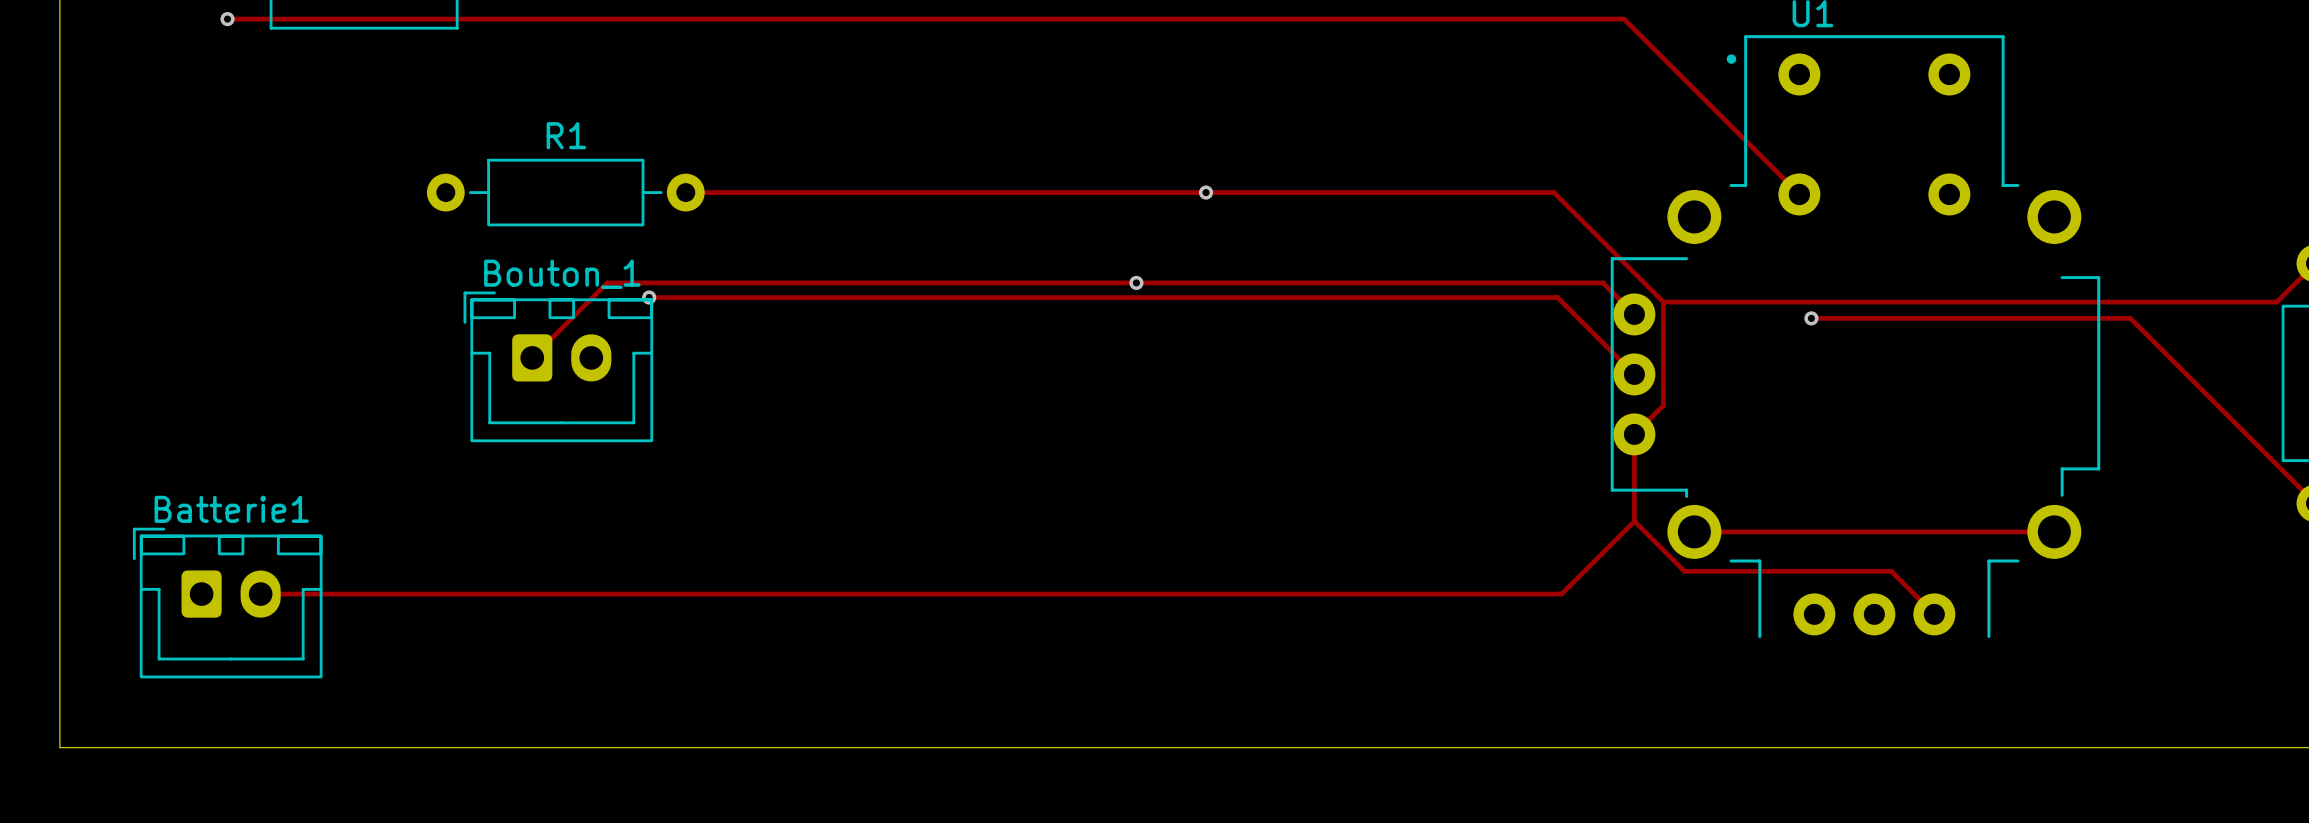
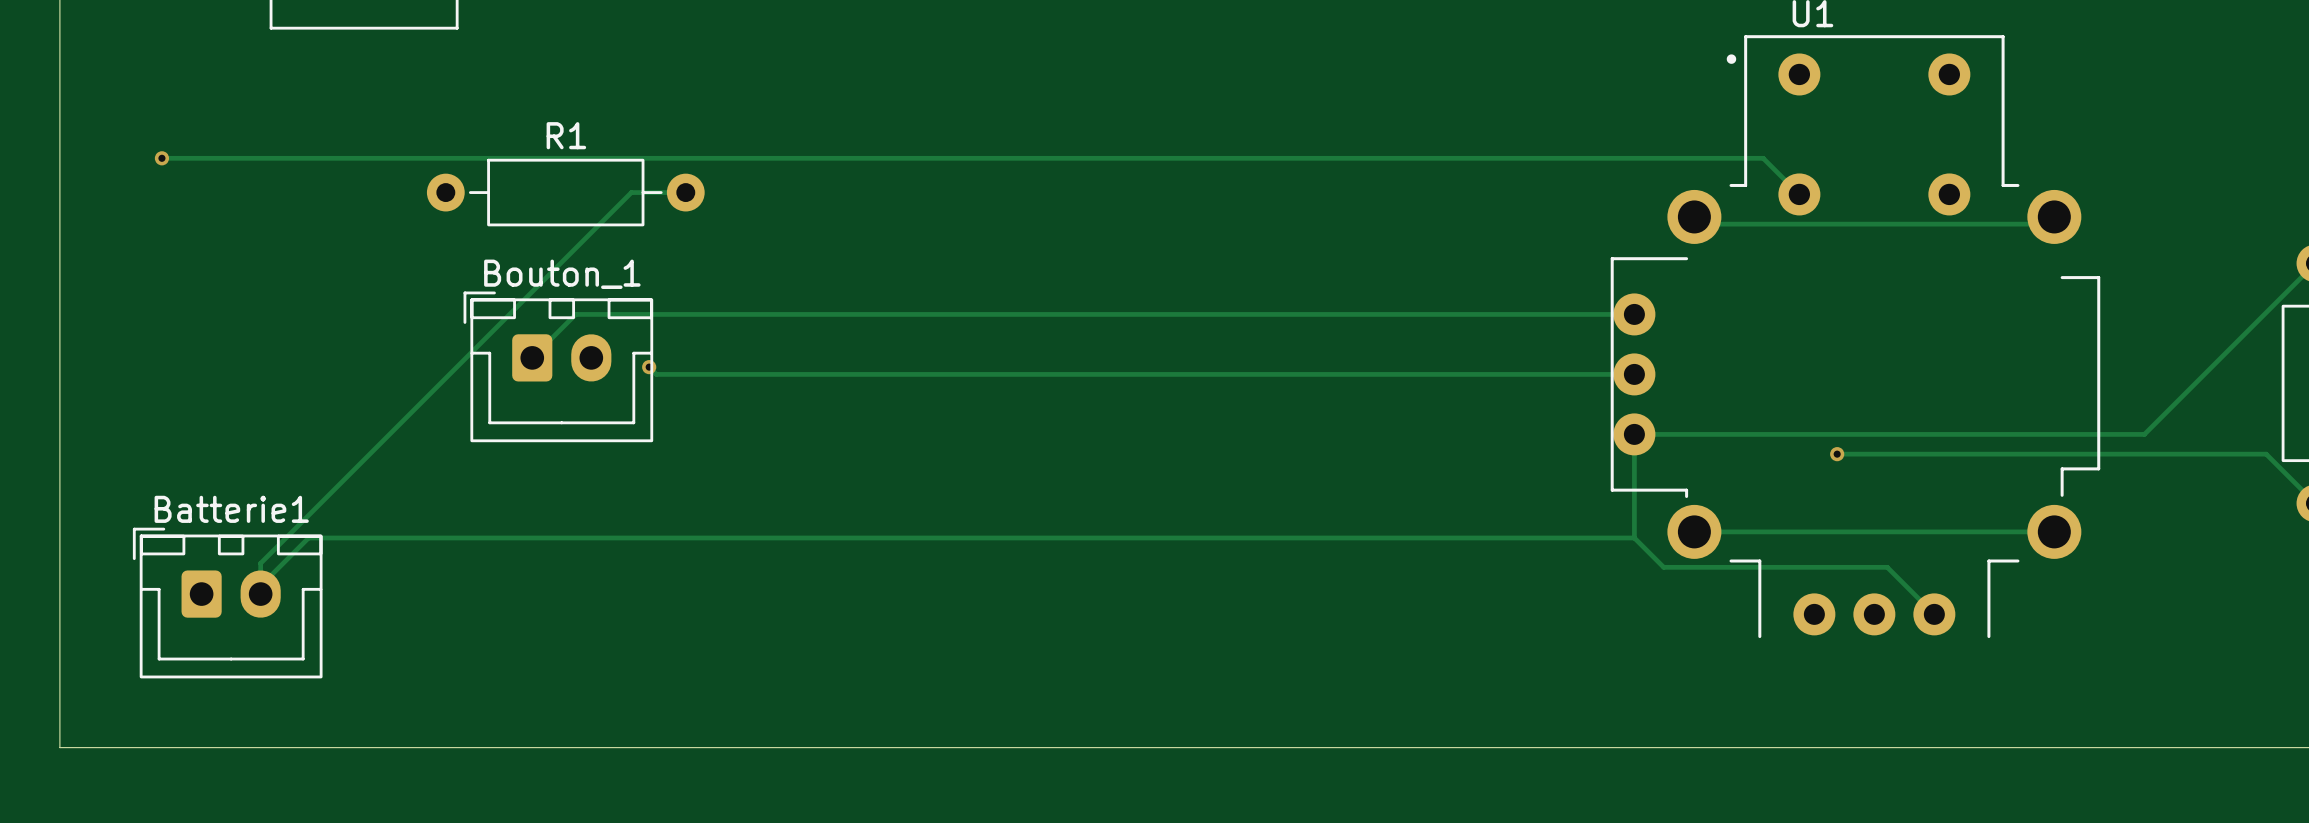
track: (227, 19) (1624, 19) (1763, 158) -> (157, 158) (1763, 158)
via: (227, 19) -> none
via: none -> (161, 158)
track: (685, 192) (1553, 192) (1663, 302) -> none
via: (1206, 192) -> none
track: none -> (1694, 216) (1701, 224) (2047, 224) (2054, 216)
via: (1136, 282) -> none
track: (649, 297) (1557, 297) (1634, 374) -> (649, 367) (656, 374) (1634, 374)
via position: (649, 297) -> (649, 367)
track: (1663, 302) (2276, 302) -> (1634, 434) (2144, 434) (2276, 302)
track: (1663, 302) (1663, 405) (1634, 434) -> none
track: (575, 314) (607, 282) (1602, 282) (1634, 314) -> (575, 314) (1634, 314)
track: (1811, 318) (2130, 318) (2266, 454) -> (1837, 454) (2266, 454)
via position: (1811, 318) -> (1837, 454)
track: none -> (1634, 521) (1634, 537)
track: none -> (1634, 537) (308, 537) (260, 585)
track: none -> (1634, 537) (1663, 567) (1887, 567) (1891, 571)
track: (1891, 571) (1684, 571) (1634, 521) (1561, 594) (260, 594) -> (685, 192) (631, 192) (260, 563) (260, 594)

